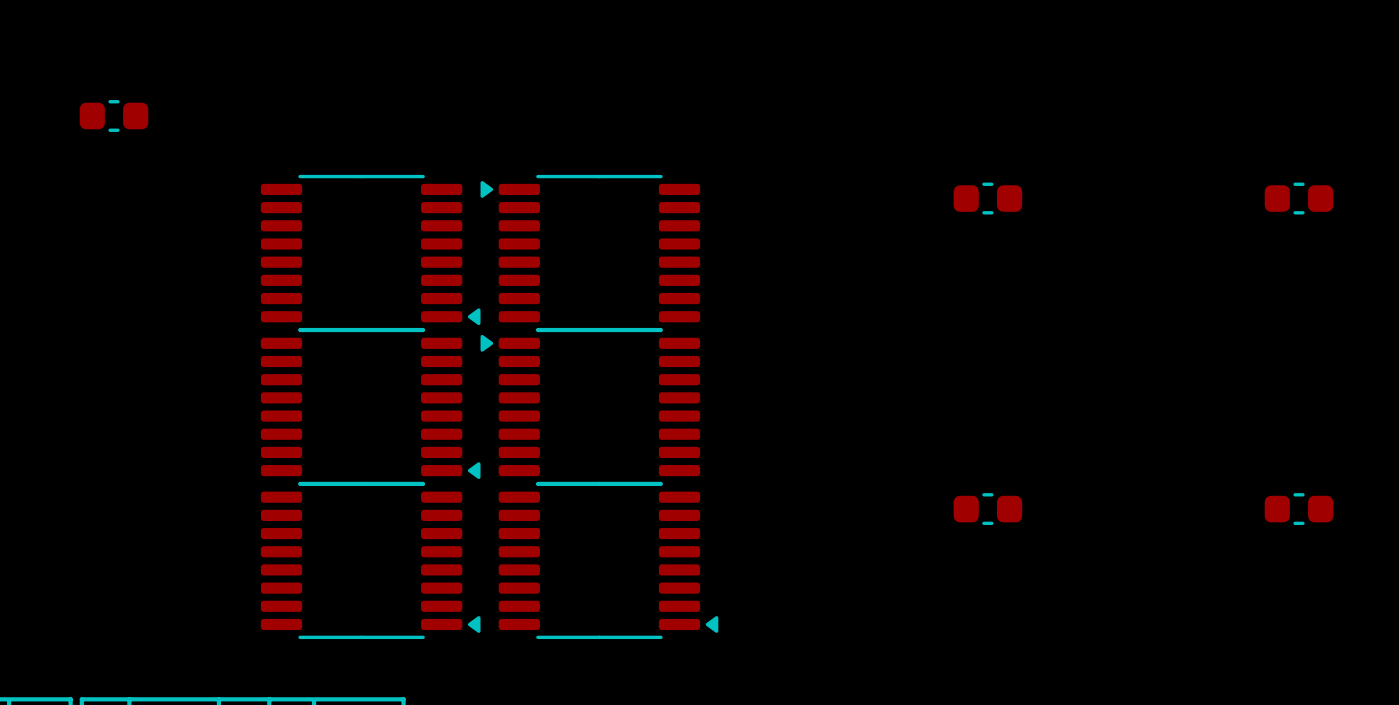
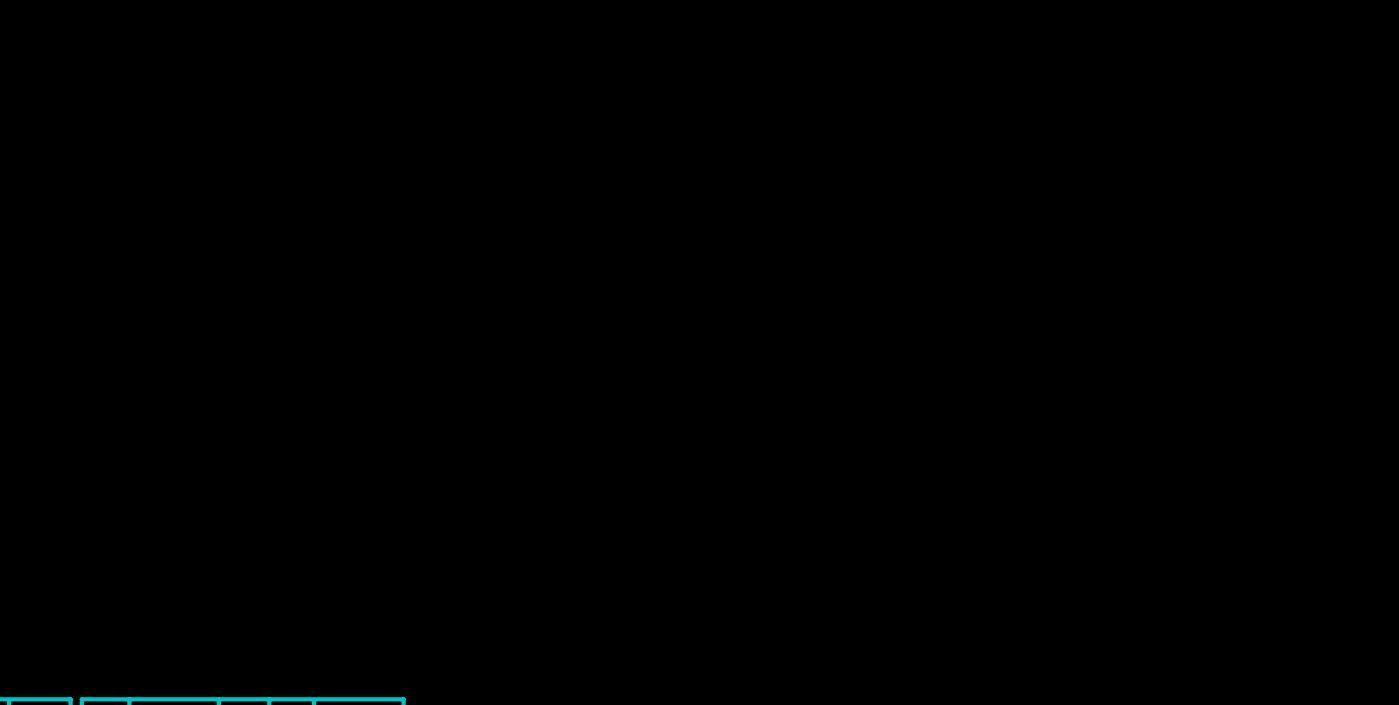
part: (114, 115) -> none
part: (987, 198) -> none
part: (1298, 198) -> none
part: (370, 253) -> none
part: (590, 253) -> none
part: (370, 406) -> none
part: (590, 406) -> none
part: (987, 509) -> none
part: (1298, 509) -> none
part: (370, 560) -> none
part: (608, 560) -> none

